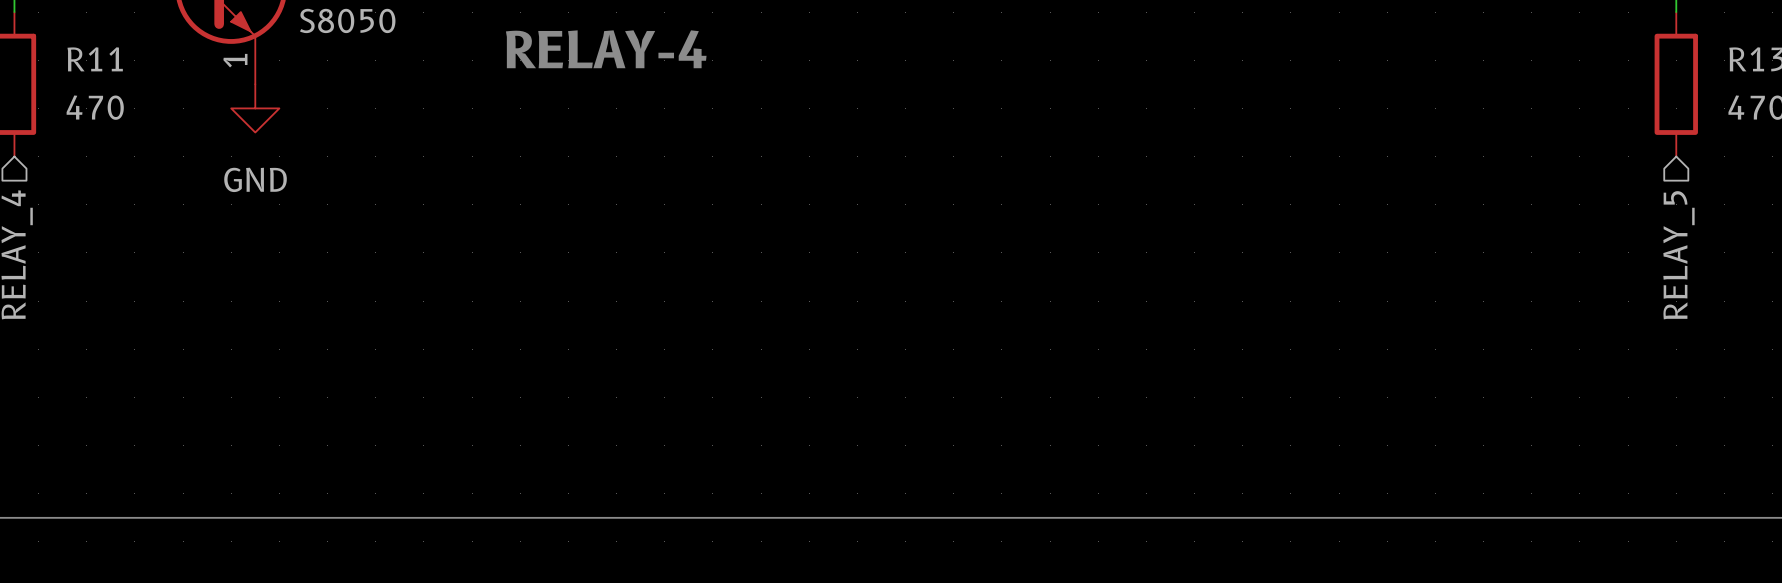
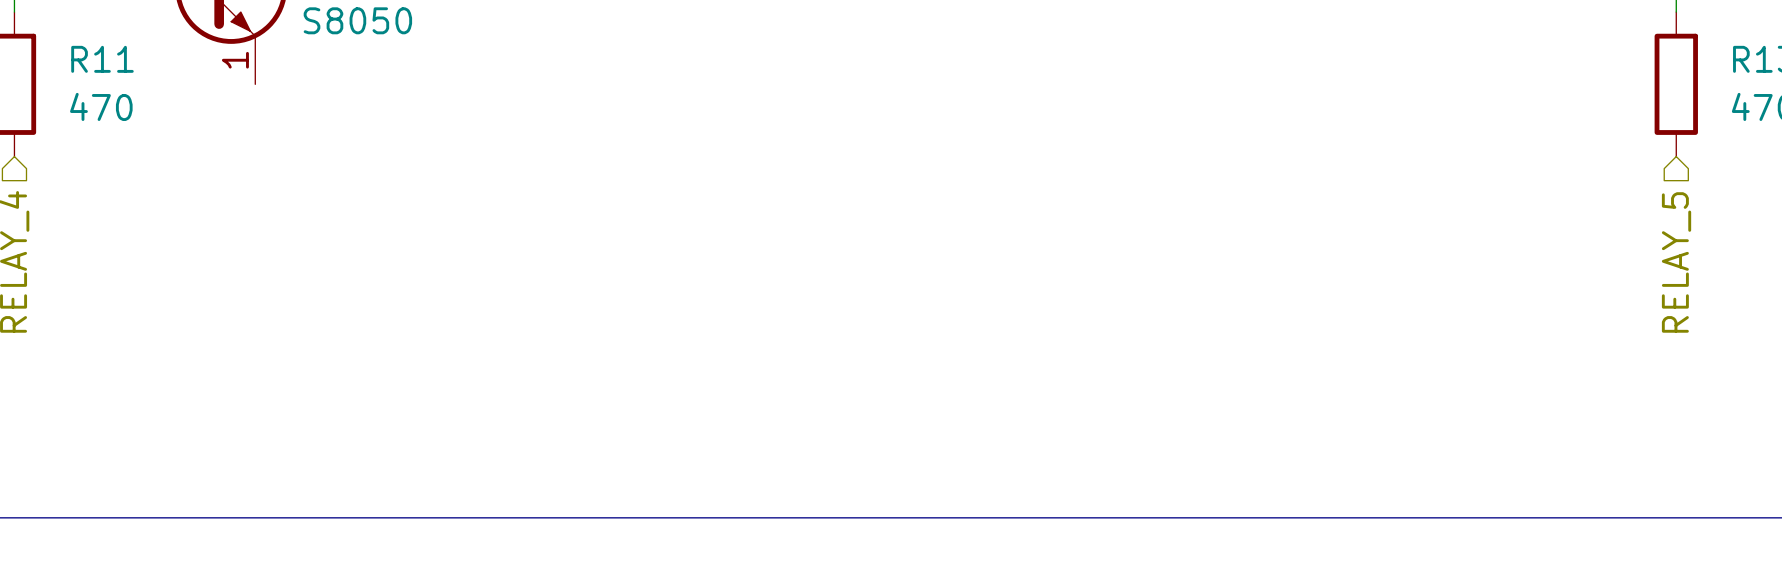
text: RELAY-4 (606, 49) -> none
power symbol: GND (255, 108) -> none

